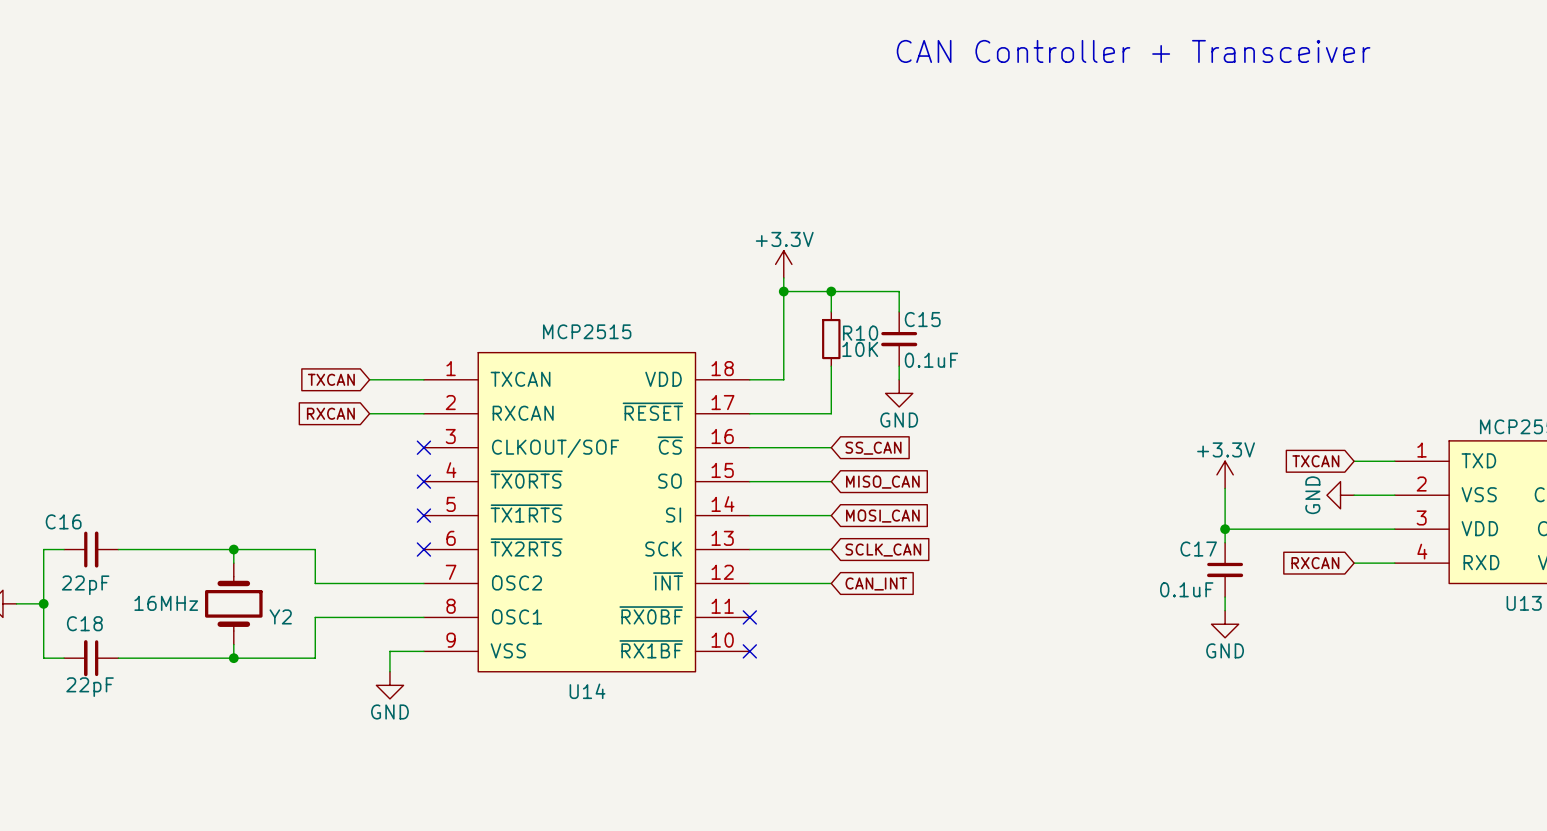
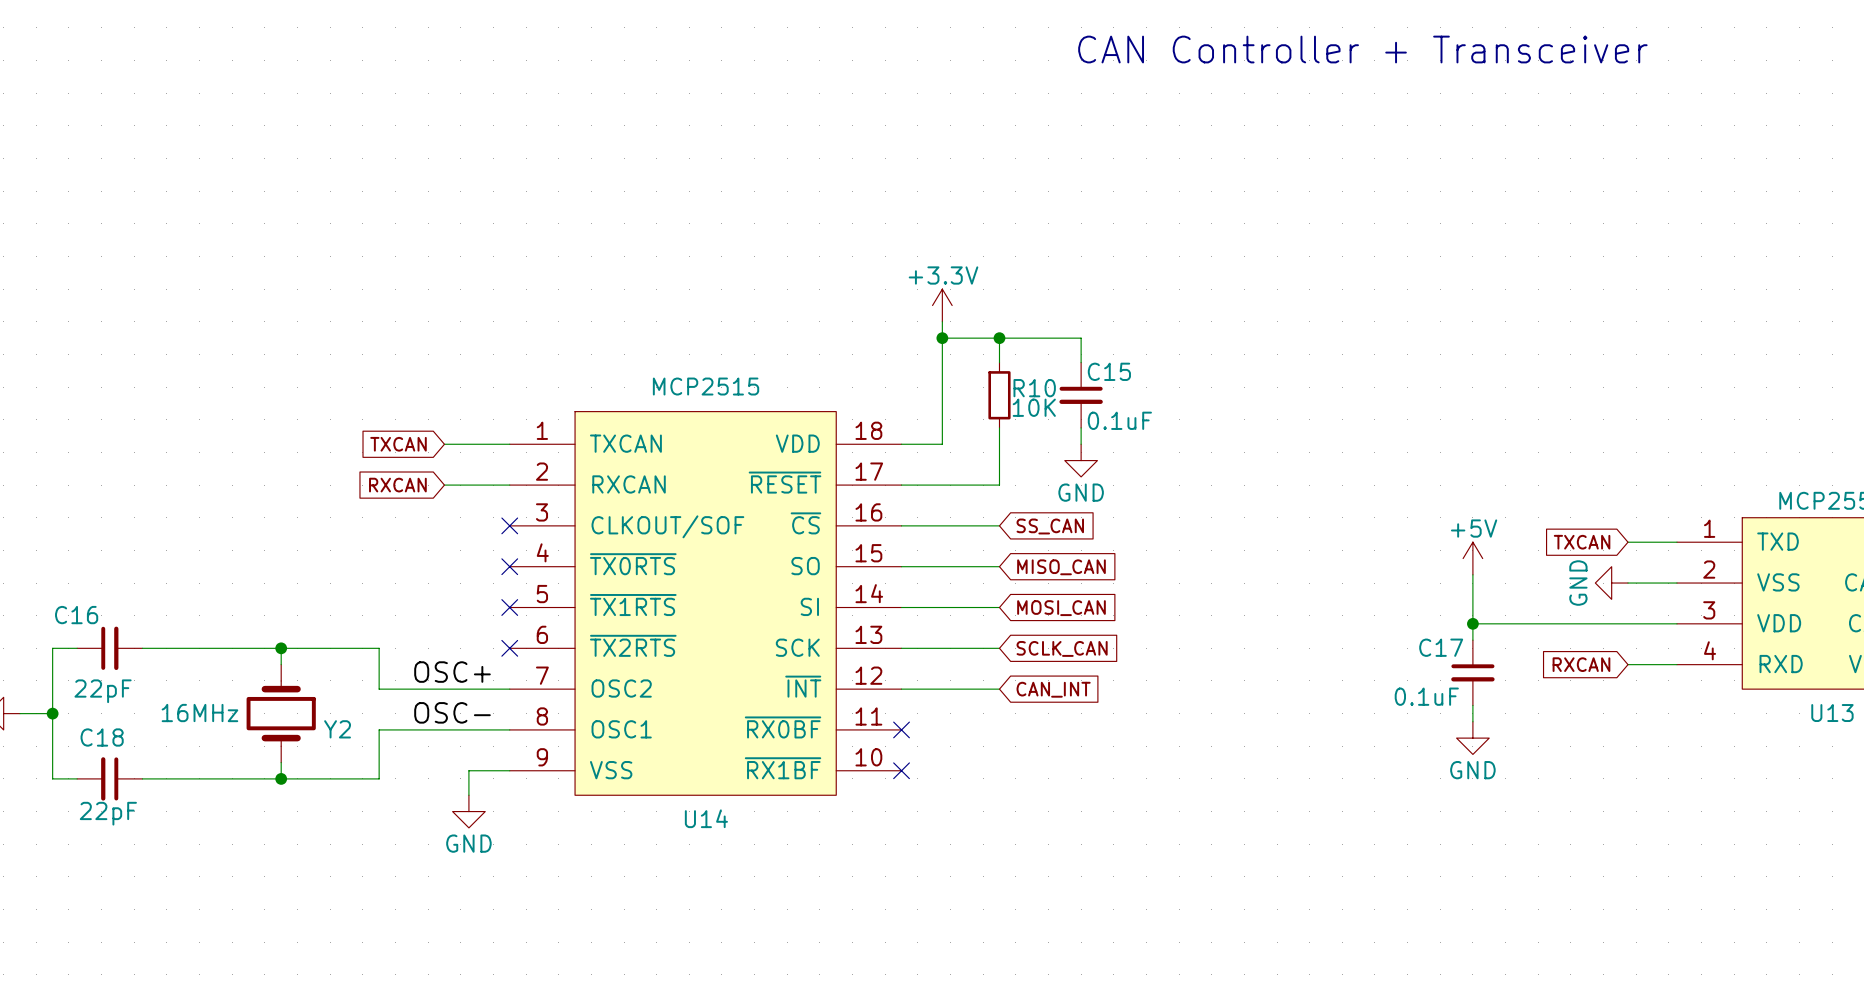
power symbol: +3.3V (1225, 474) -> +5V (1472, 558)
label: none -> OSC+ (452, 672)
label: none -> OSC- (452, 712)

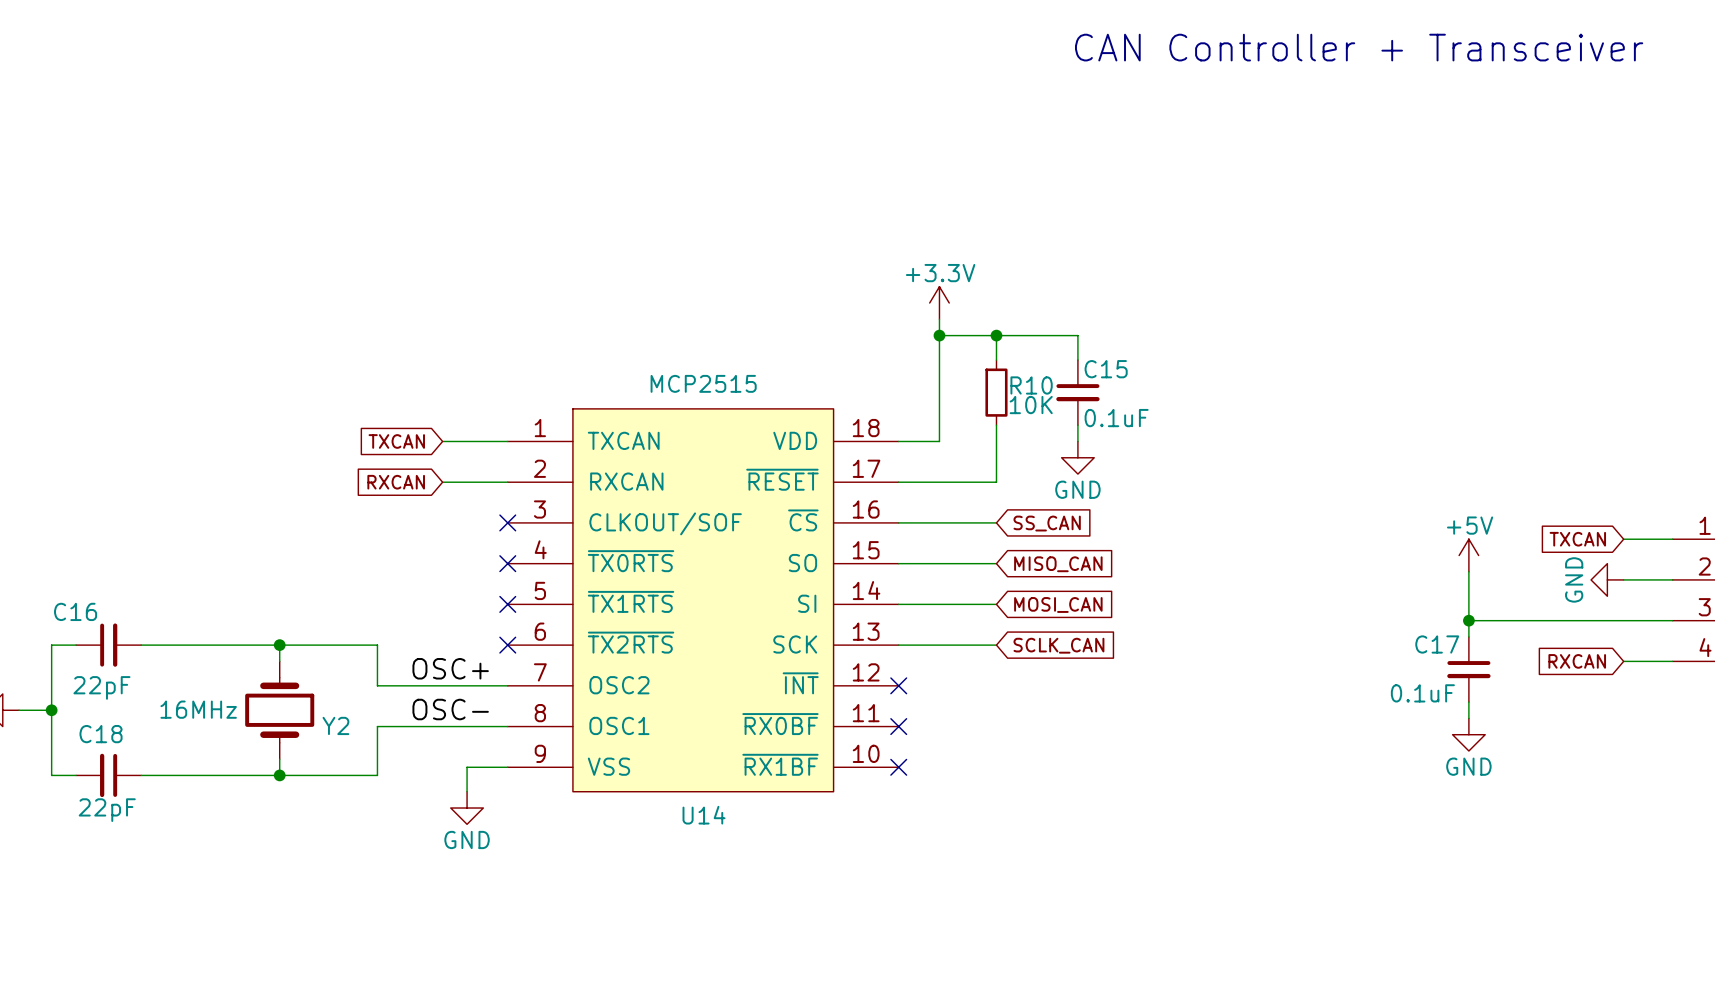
wire: (901, 689) (999, 689) -> none
no-connect mark: none -> (898, 685)
global label: CAN_INT (1053, 689) -> none

